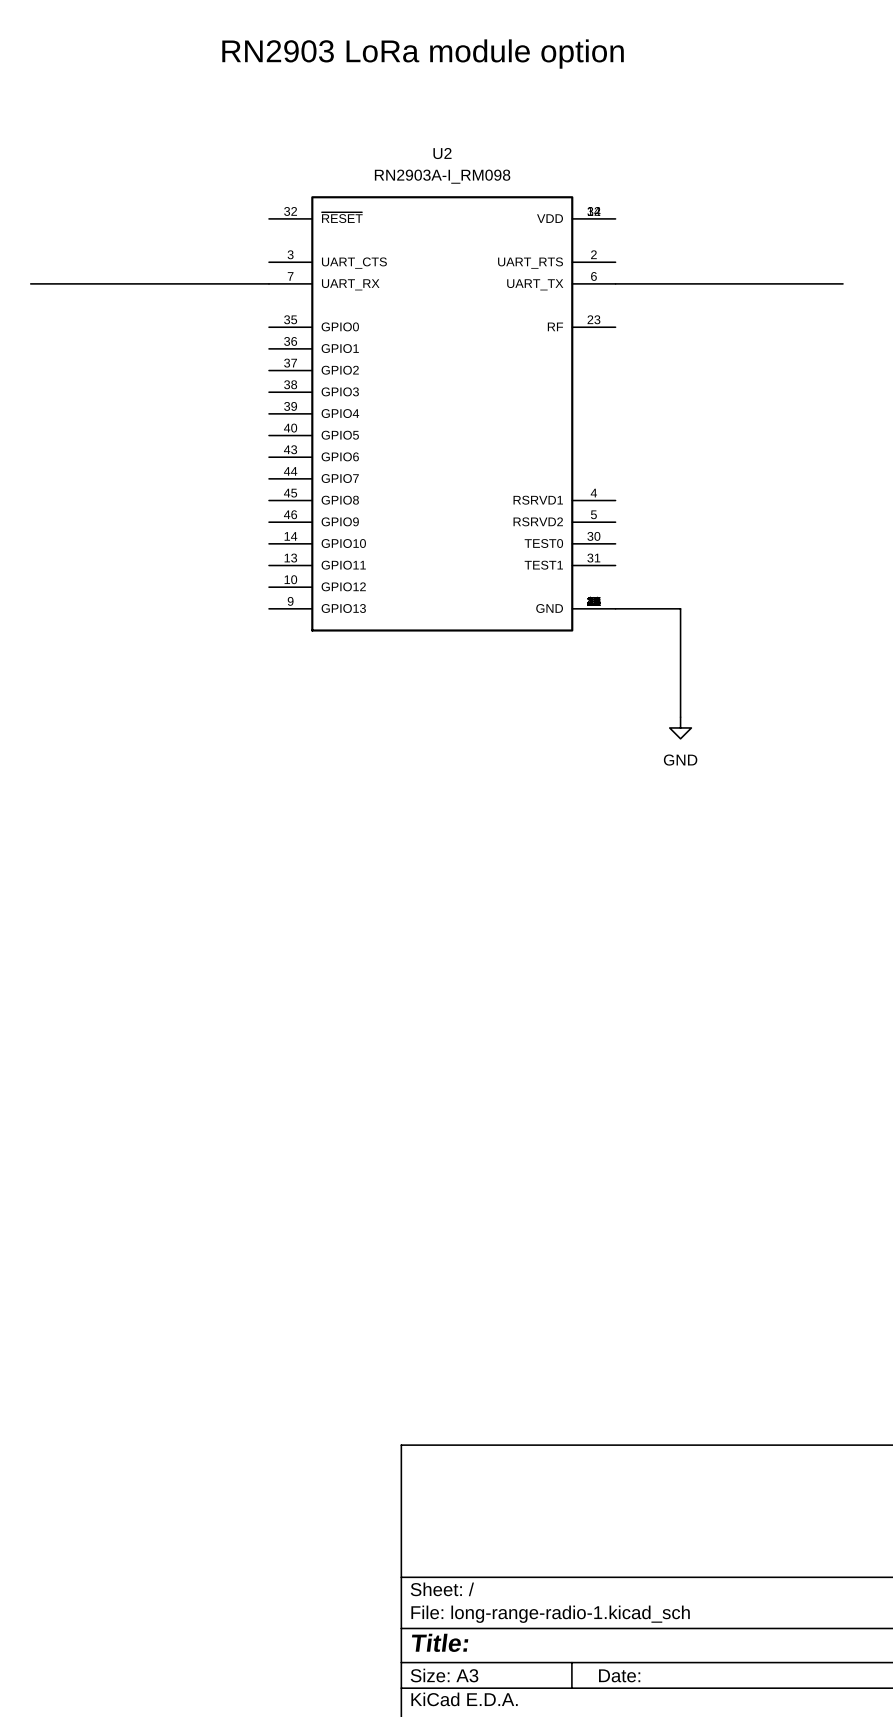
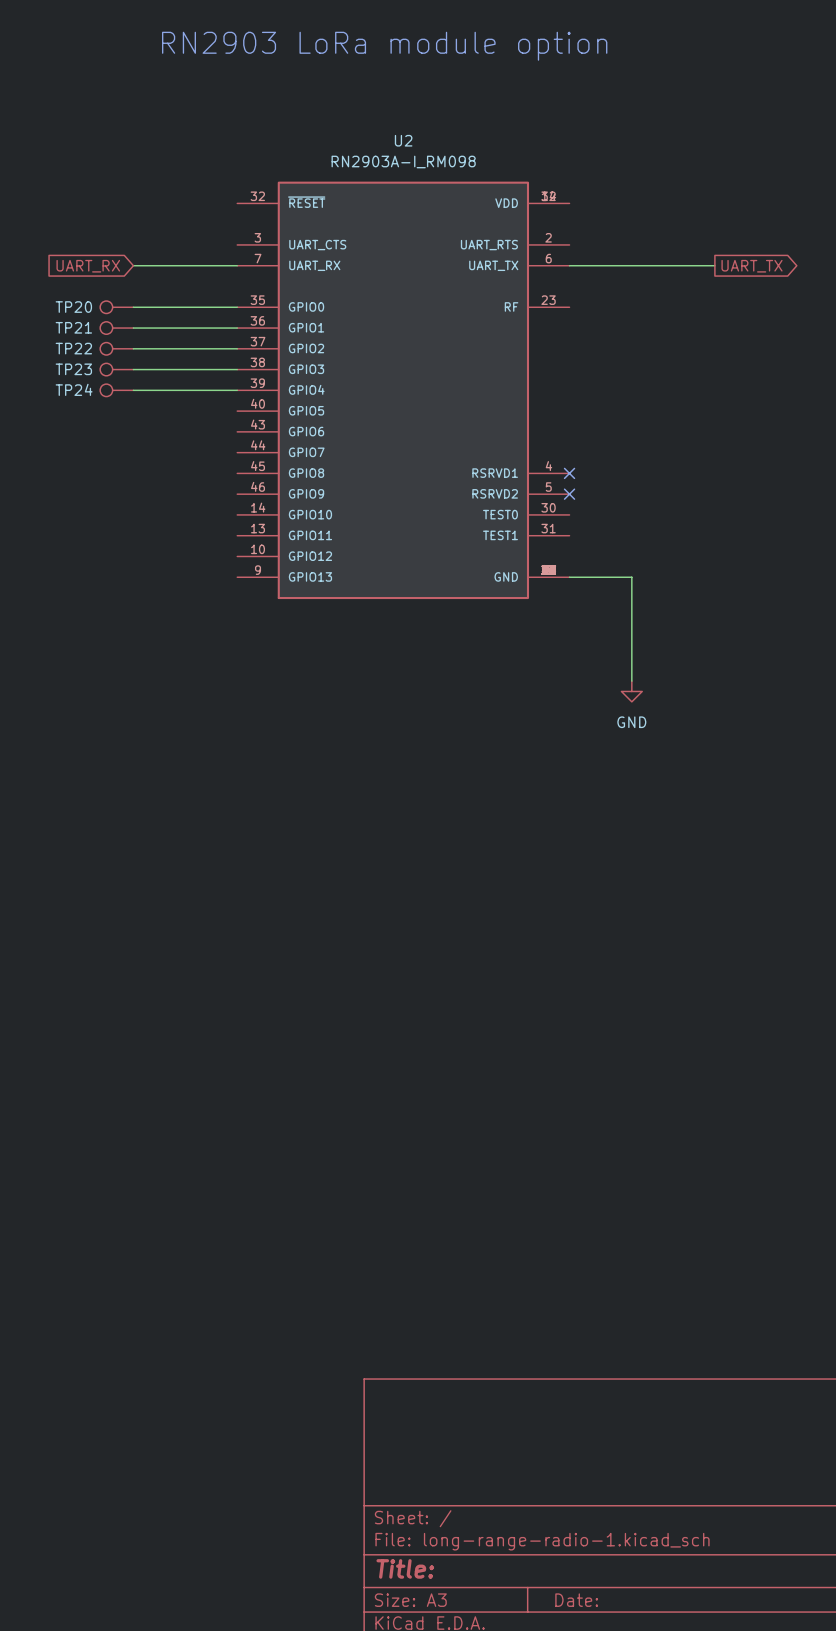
wire: (30, 283) (160, 283) -> none
wire: (767, 283) (843, 283) -> none
global label: none -> UART_RX (88, 266)
global label: none -> UART_TX (752, 266)
TP20: none -> (116, 307)
wire: none -> (133, 307) (237, 307)
TP21: none -> (116, 328)
wire: none -> (133, 328) (237, 328)
TP22: none -> (116, 348)
wire: none -> (133, 348) (237, 348)
TP23: none -> (116, 369)
wire: none -> (133, 369) (237, 369)
TP24: none -> (116, 390)
wire: none -> (133, 390) (237, 390)
no-connect mark: none -> (569, 473)
no-connect mark: none -> (569, 494)

